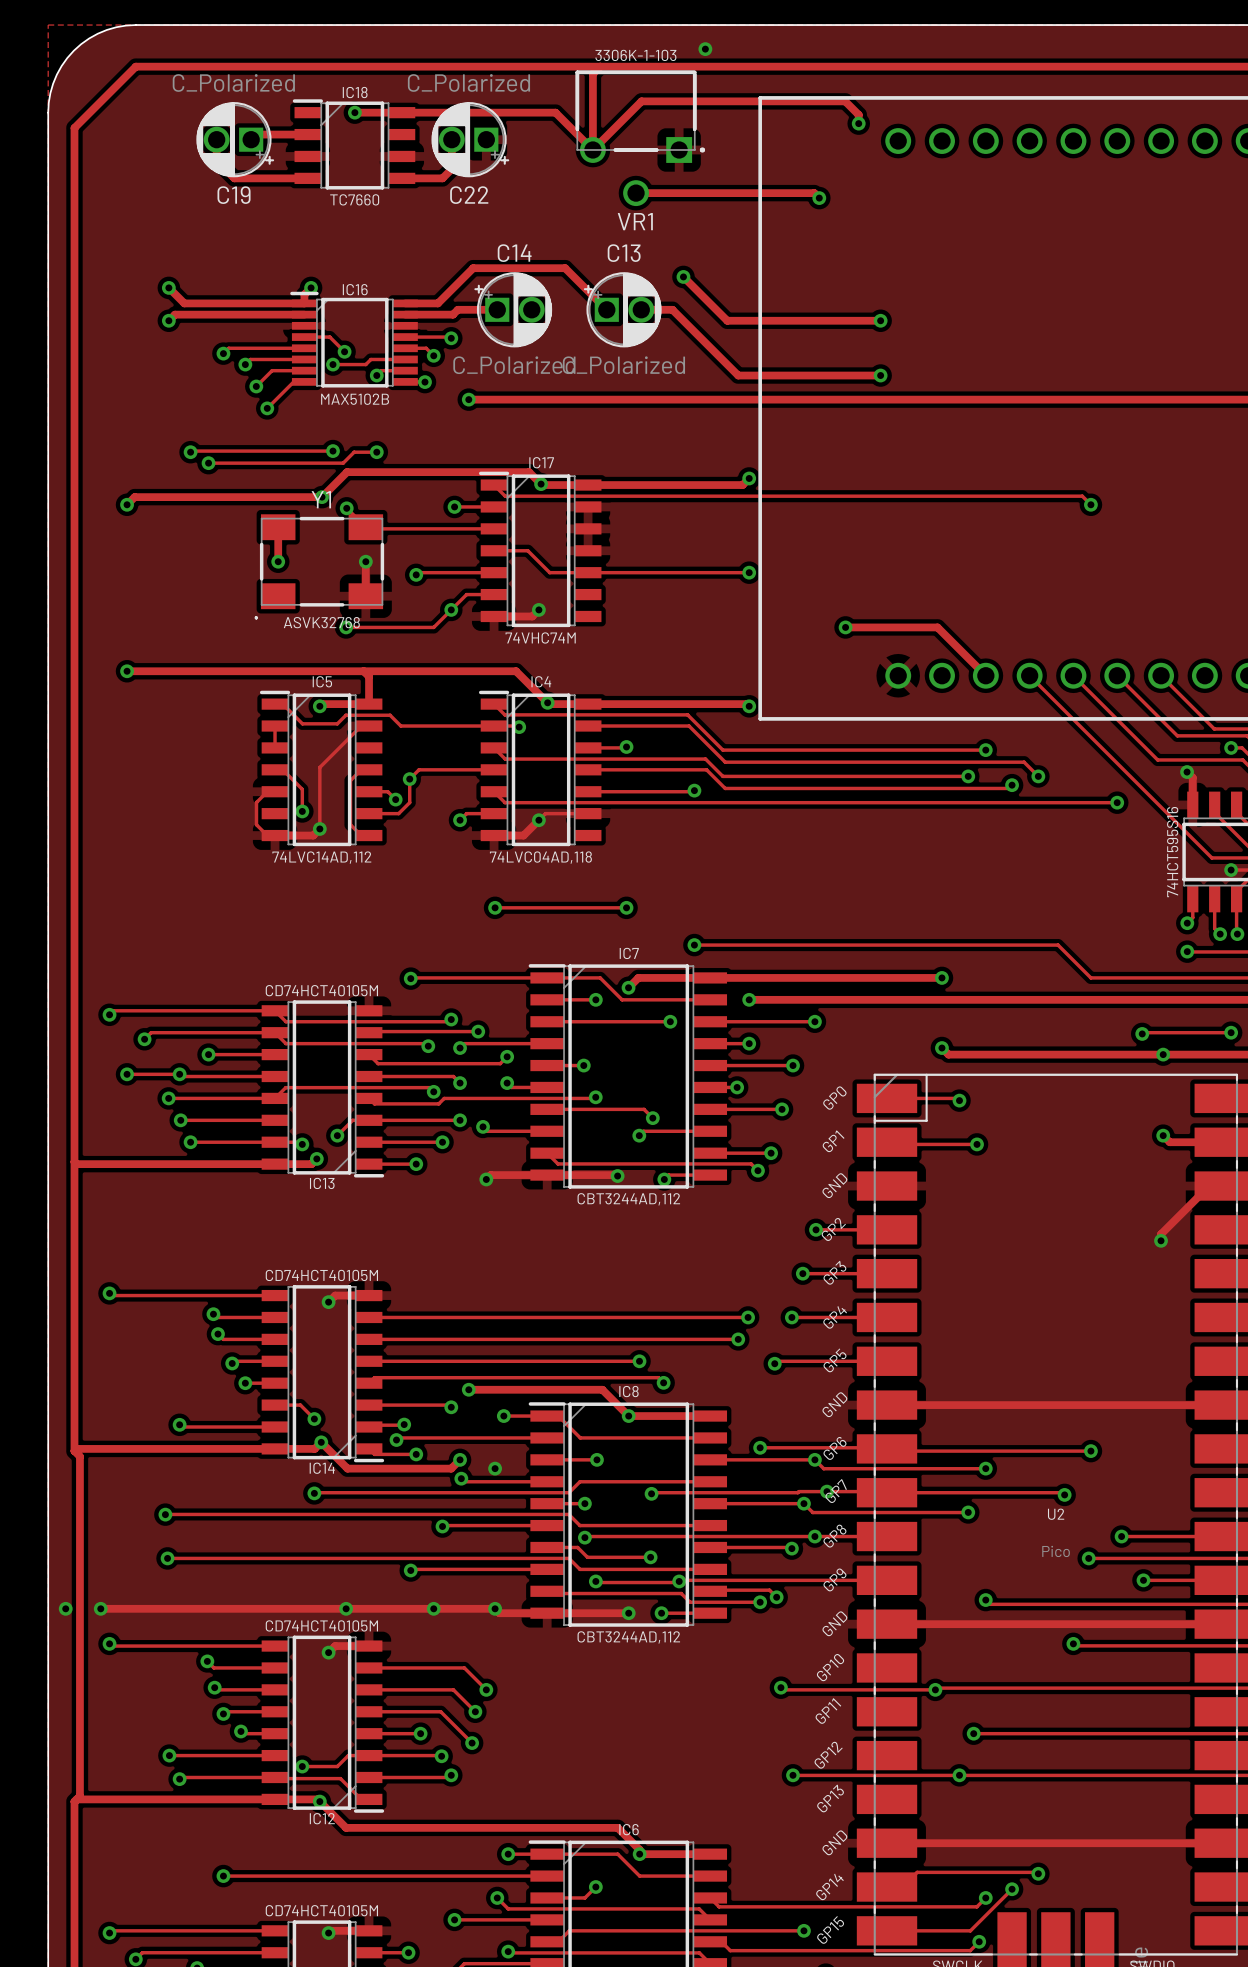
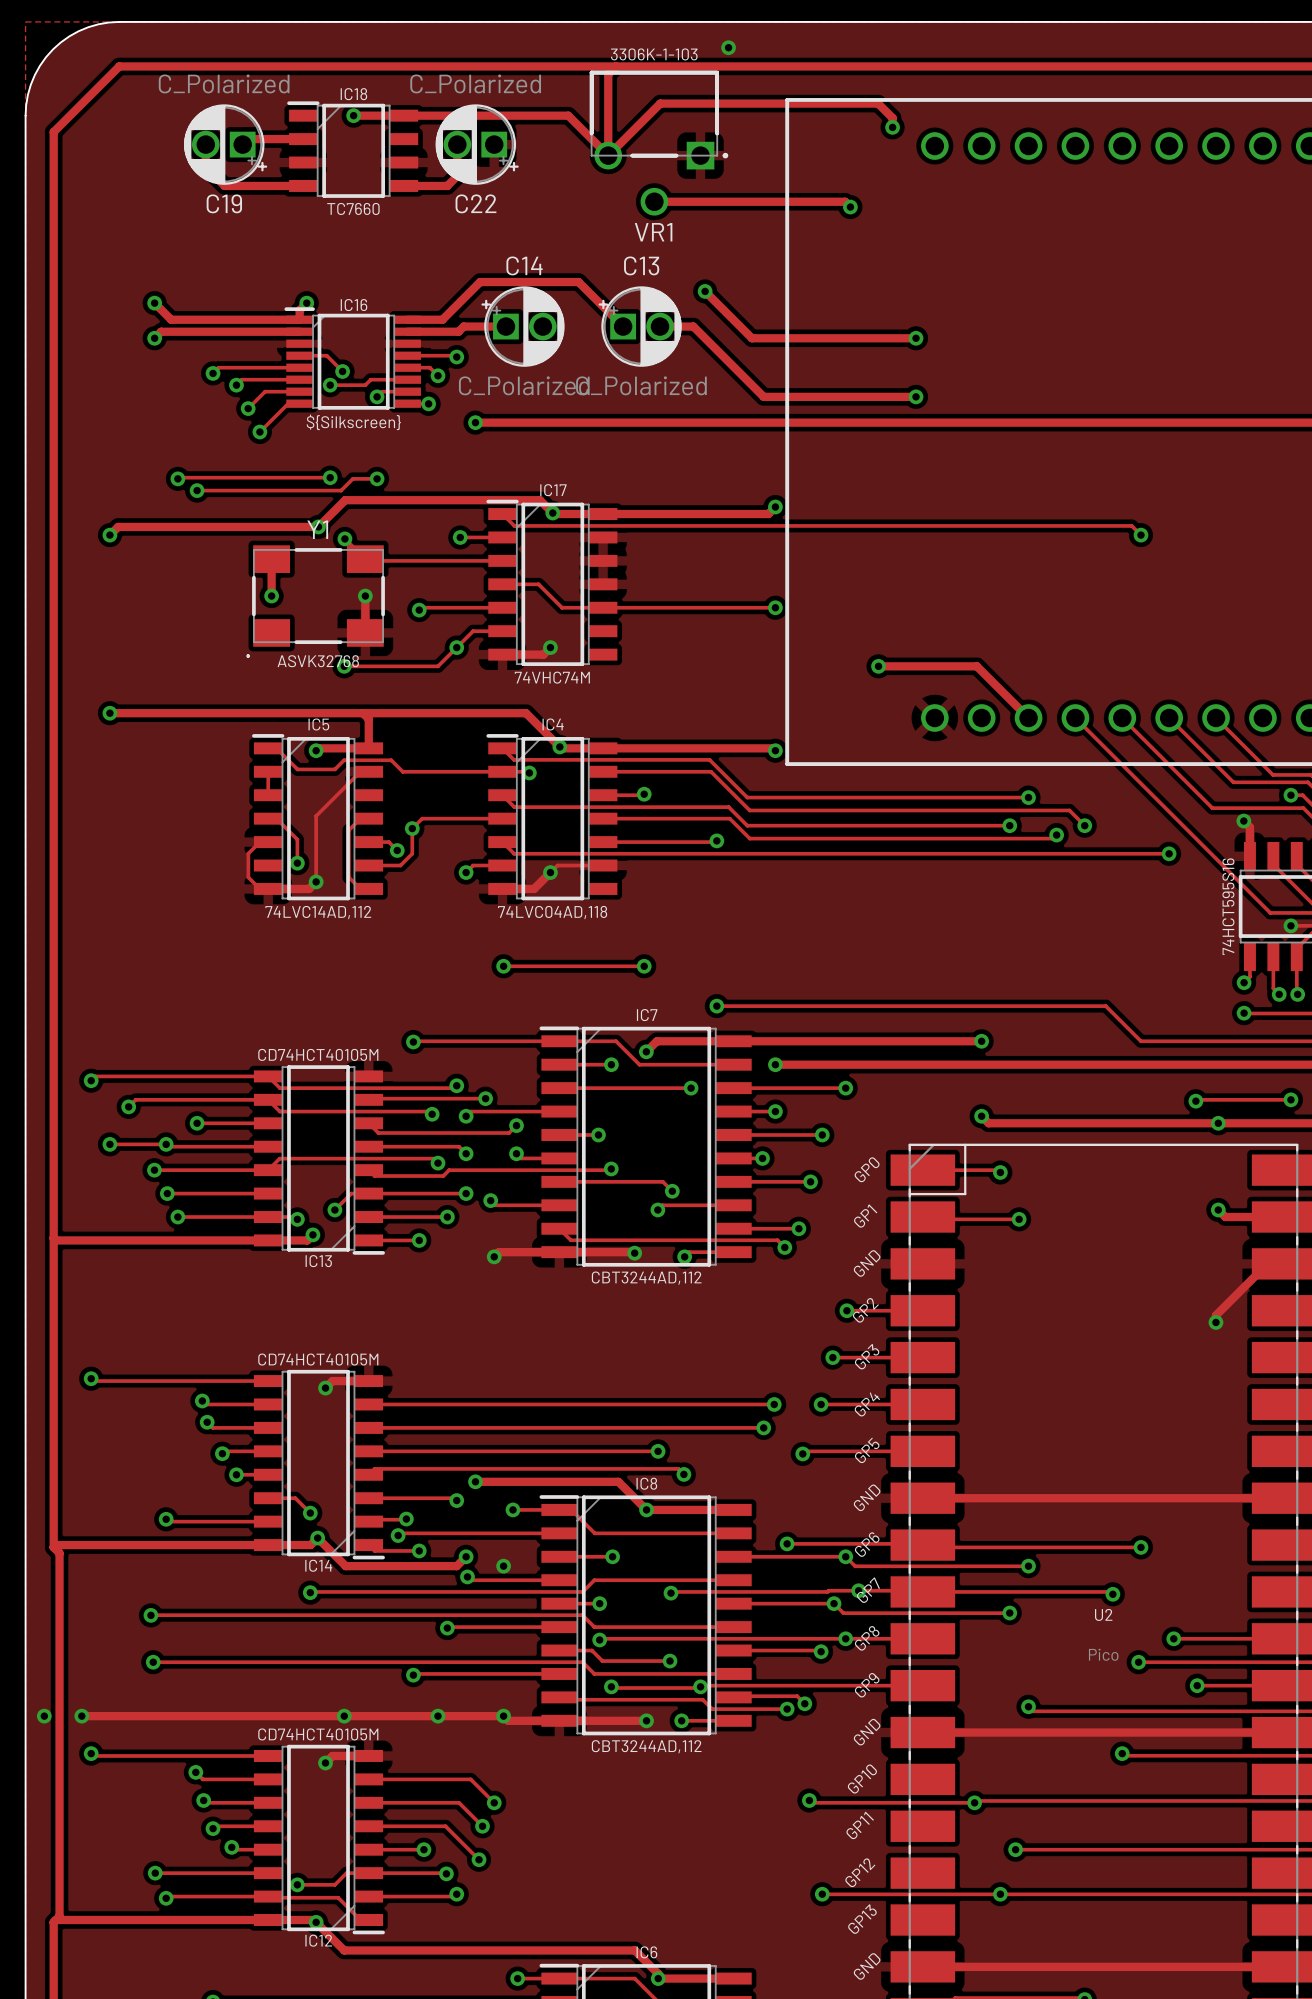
IC16 text: MAX5102B (355, 399) -> ${Silkscreen} (353, 422)

